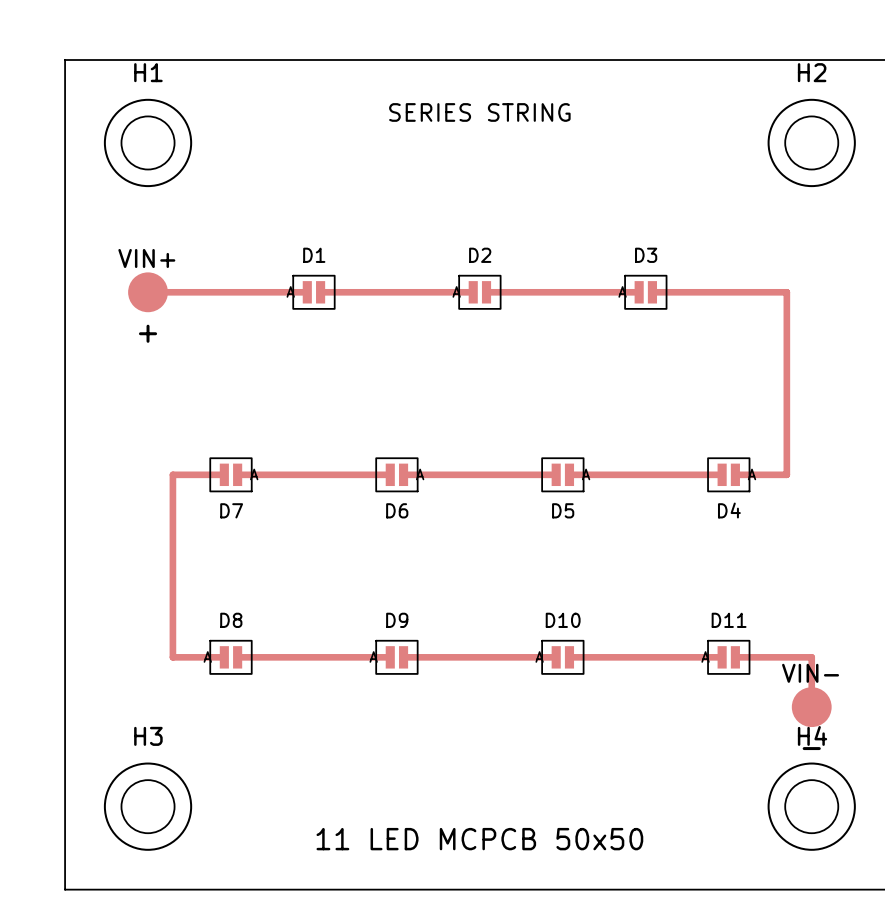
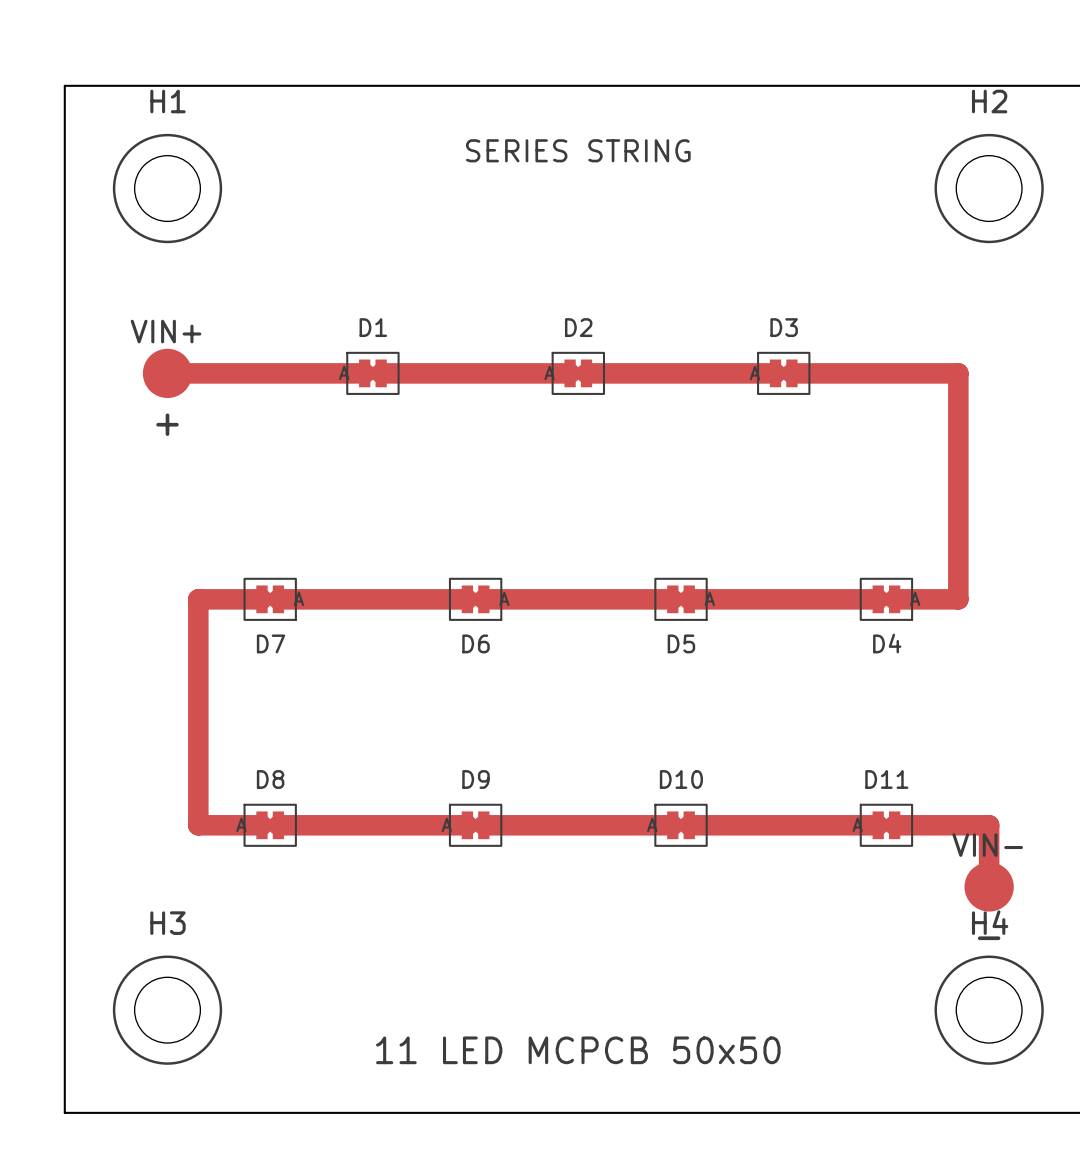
top track width: thin (148, 292) (307, 292) -> thick (167, 373) (364, 373)
top track width: thin (320, 292) (473, 292) -> thick (381, 373) (570, 373)
top track width: thin (486, 292) (639, 292) -> thick (586, 373) (775, 373)
top track width: thin (652, 292) (786, 292) (786, 474) (735, 474) -> thick (791, 373) (958, 373) (958, 599) (894, 599)
top track width: thin (224, 474) (172, 474) (172, 657) (224, 657) -> thick (261, 599) (198, 599) (198, 825) (261, 825)
top track width: thin (237, 474) (390, 474) -> thick (278, 599) (467, 599)
top track width: thin (403, 474) (556, 474) -> thick (483, 599) (672, 599)
top track width: thin (569, 474) (722, 474) -> thick (689, 599) (878, 599)
top track width: thin (237, 657) (390, 657) -> thick (278, 825) (467, 825)
top track width: thin (403, 657) (556, 657) -> thick (483, 825) (672, 825)
top track width: thin (569, 657) (722, 657) -> thick (689, 825) (878, 825)
top track width: thin (735, 657) (811, 657) (811, 707) -> thick (894, 825) (989, 825) (989, 886)

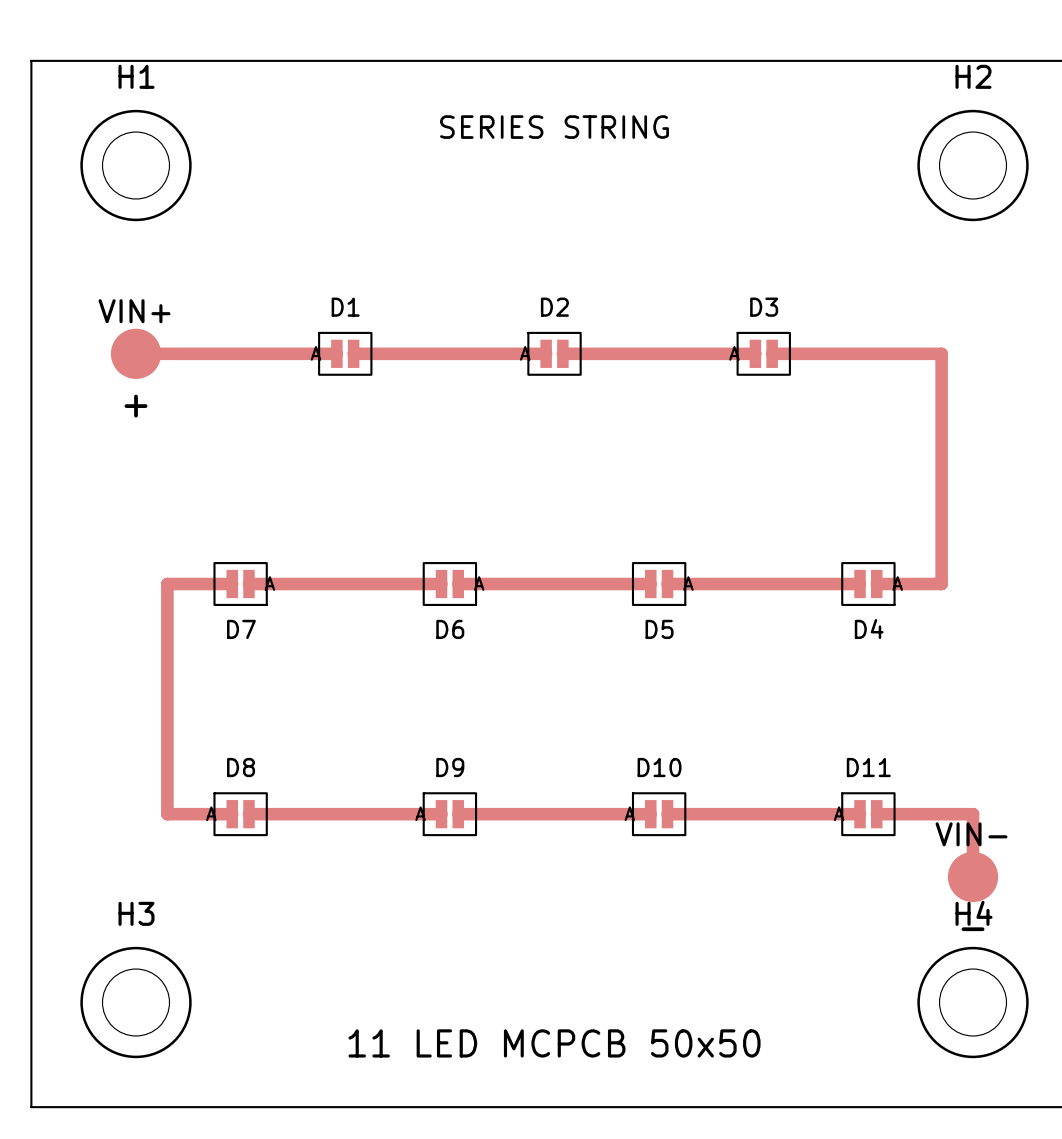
top track width: thick (167, 373) (364, 373) -> thin (136, 353) (336, 353)
top track width: thick (381, 373) (570, 373) -> thin (353, 353) (546, 353)
top track width: thick (586, 373) (775, 373) -> thin (562, 353) (755, 353)
top track width: thick (791, 373) (958, 373) (958, 599) (894, 599) -> thin (772, 353) (941, 353) (941, 584) (876, 584)
top track width: thick (261, 599) (198, 599) (198, 825) (261, 825) -> thin (232, 584) (167, 584) (167, 814) (232, 814)
top track width: thick (278, 599) (467, 599) -> thin (249, 584) (441, 584)
top track width: thick (483, 599) (672, 599) -> thin (458, 584) (650, 584)
top track width: thick (689, 599) (878, 599) -> thin (667, 584) (860, 584)
top track width: thick (278, 825) (467, 825) -> thin (249, 814) (441, 814)
top track width: thick (483, 825) (672, 825) -> thin (458, 814) (650, 814)
top track width: thick (689, 825) (878, 825) -> thin (667, 814) (860, 814)
top track width: thick (894, 825) (989, 825) (989, 886) -> thin (876, 814) (973, 814) (973, 876)

